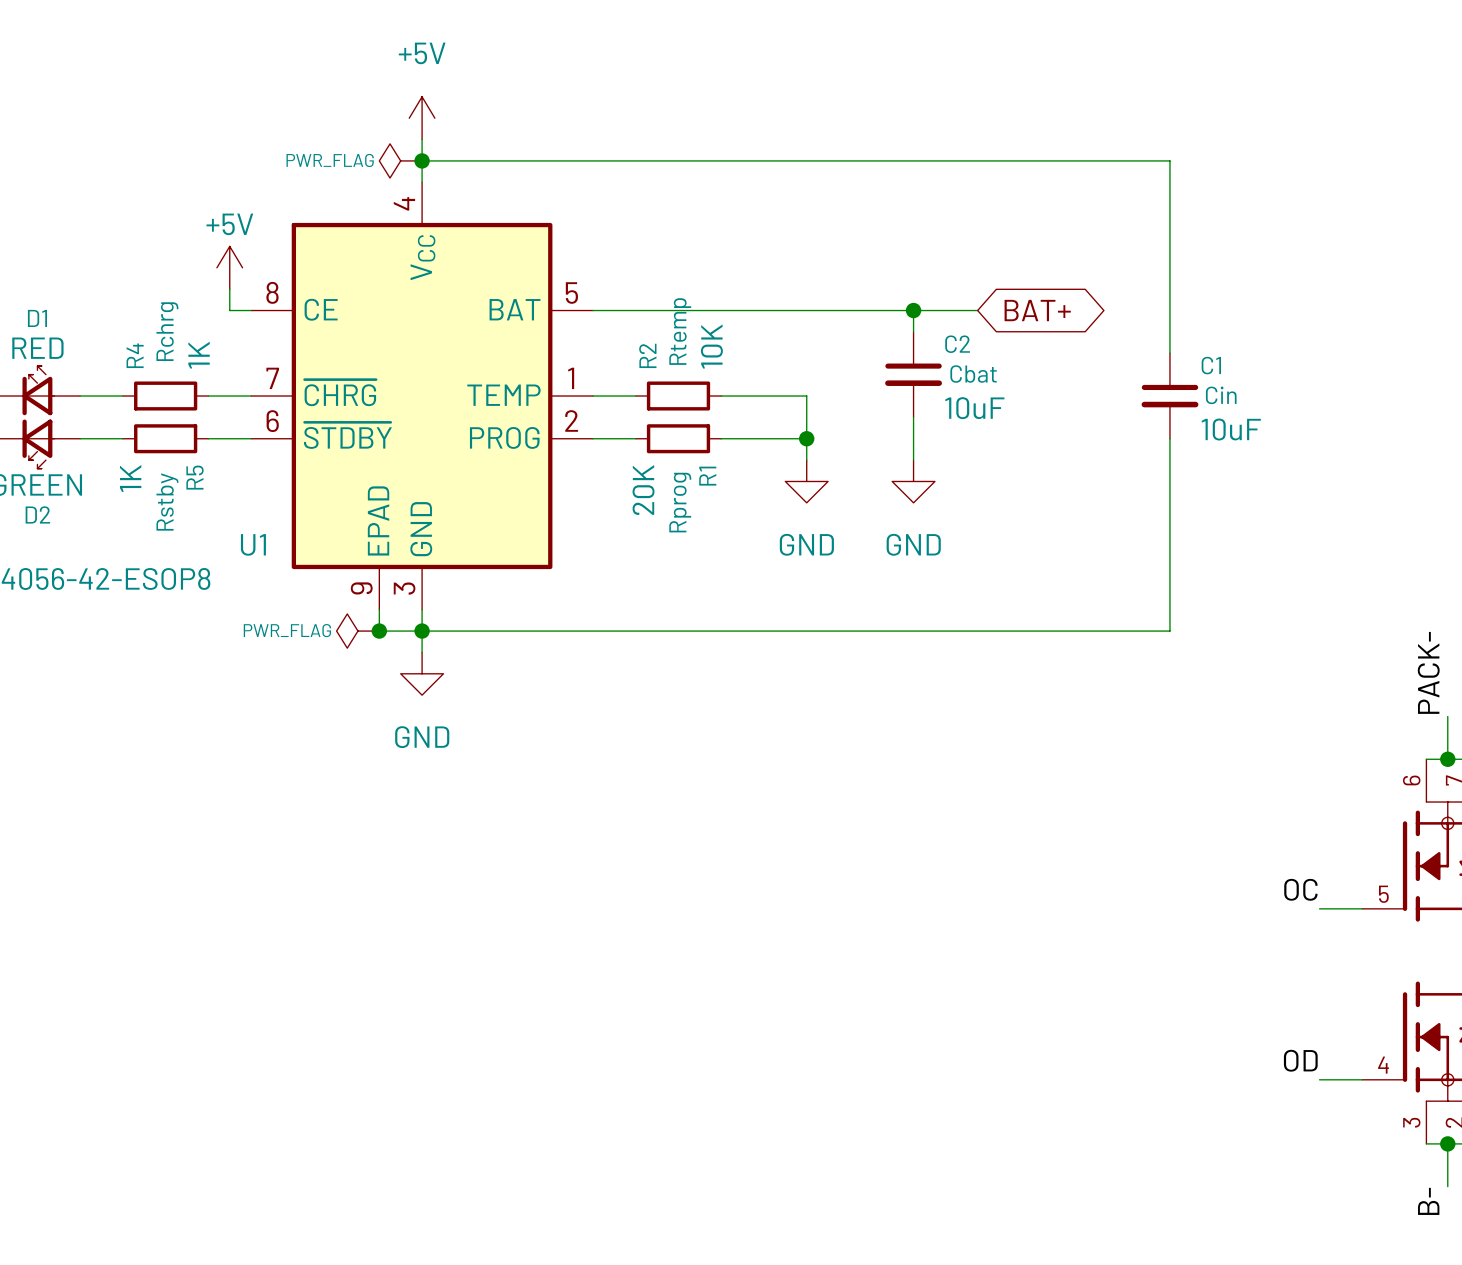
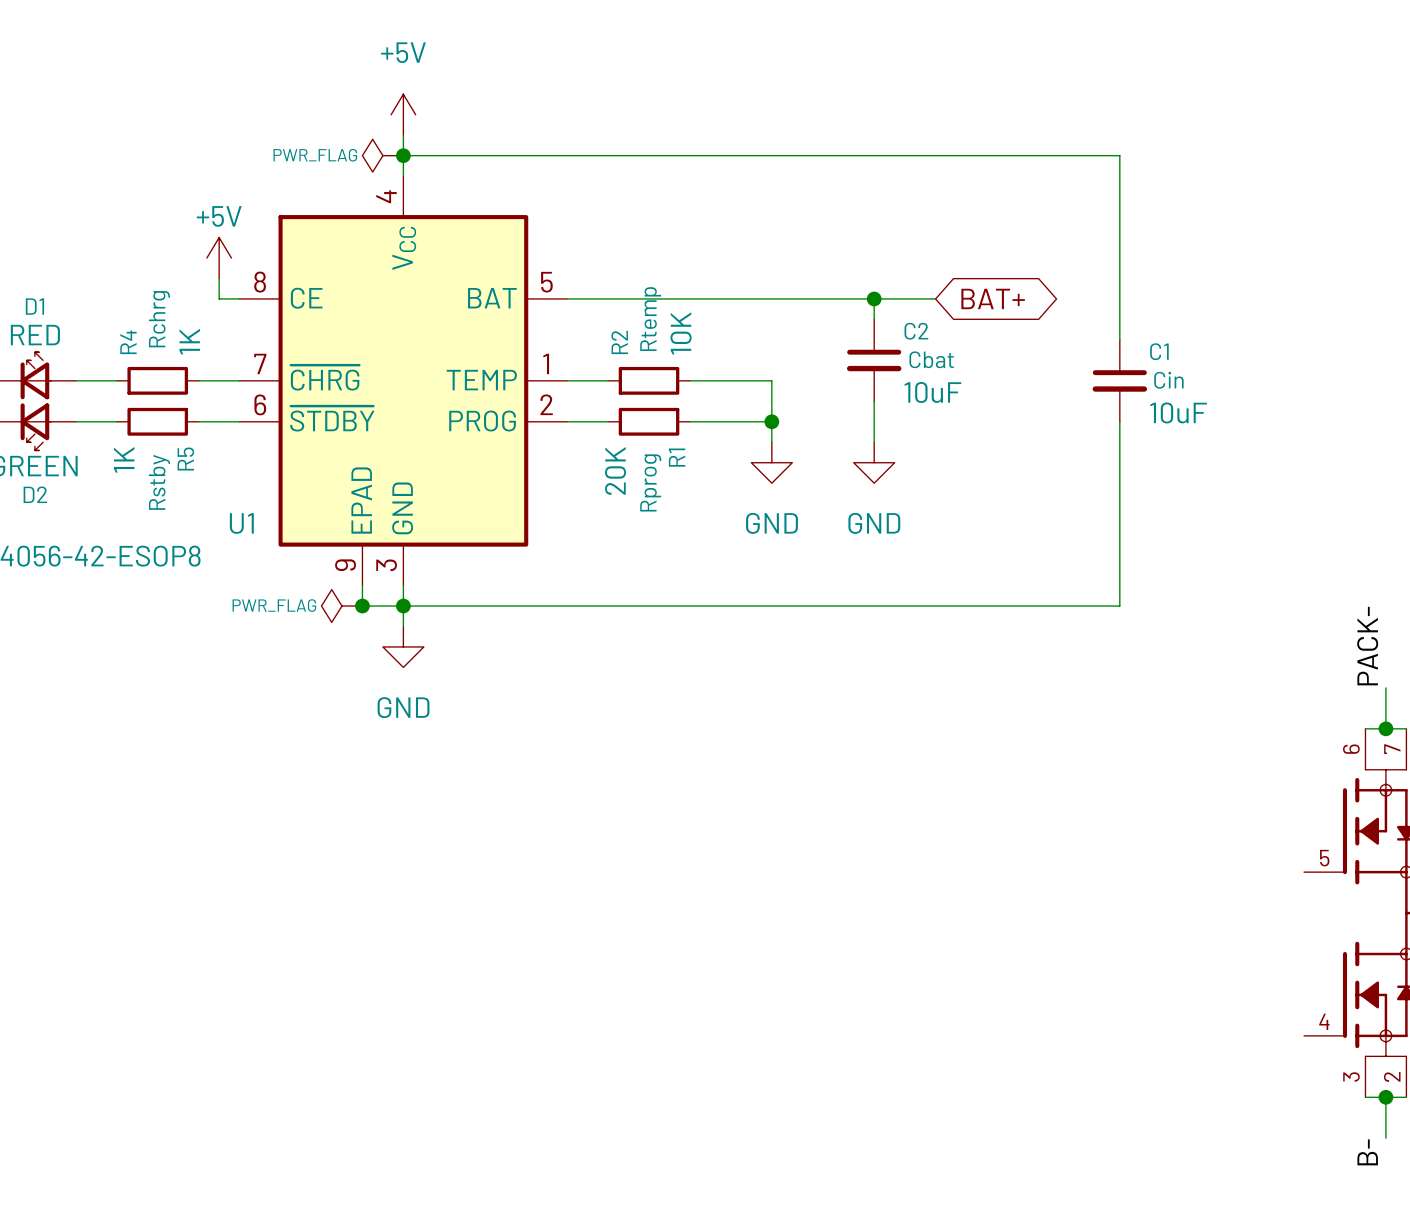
label: OC (1300, 889) -> none
wire: (1319, 908) (1362, 908) -> none
label: OD (1300, 1060) -> none
wire: (1319, 1079) (1362, 1079) -> none

